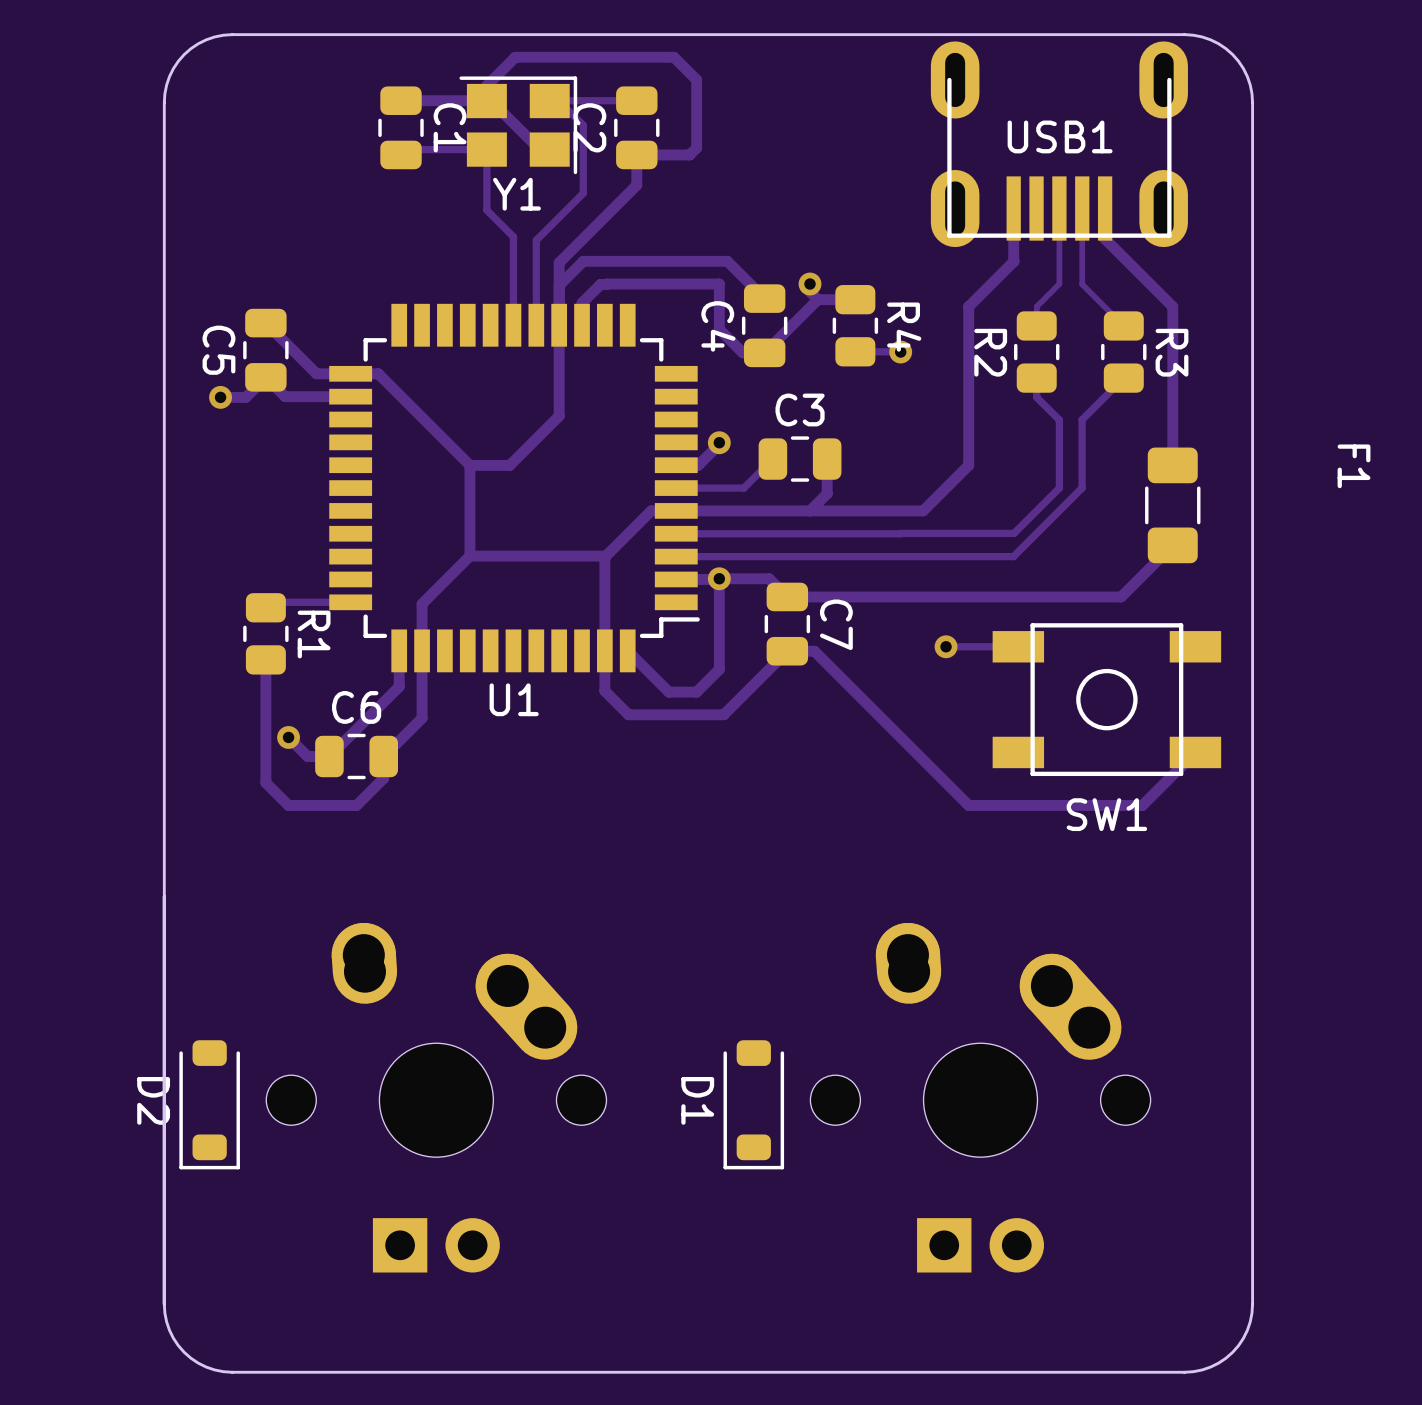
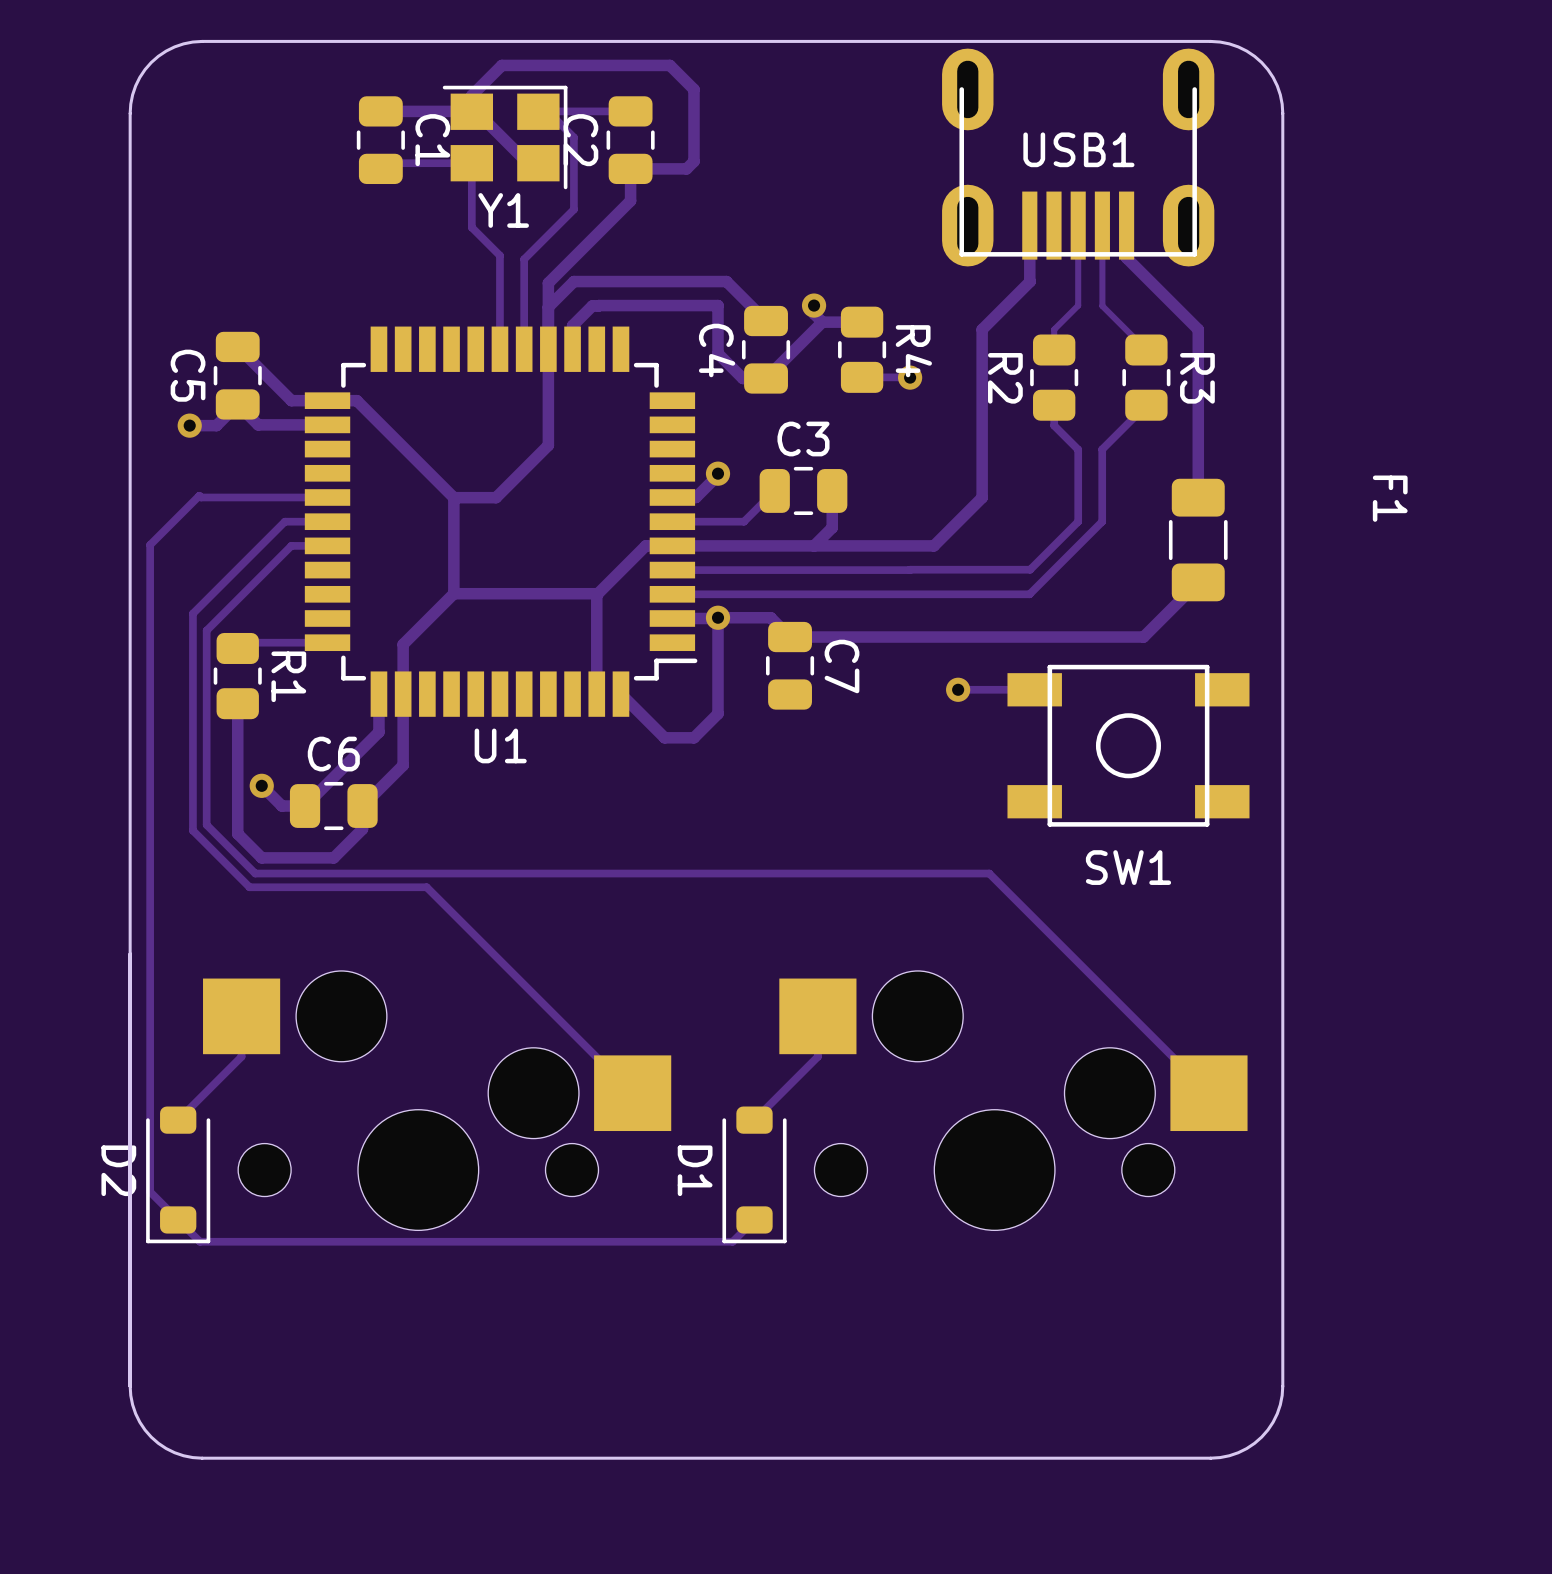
track: none -> (327, 497) (201, 497) (199, 495) (150, 544) (150, 1191) (200, 1241) (732, 1241) (754, 1219)
track: none -> (327, 521) (284, 521) (192, 613) (192, 830) (249, 887) (426, 887) (632, 1093)
track: none -> (327, 545) (291, 545) (206, 630) (206, 824) (255, 873) (989, 873) (1208, 1093)
track: (604, 650) (604, 691) (628, 714) (723, 714) (787, 651) (814, 651) (968, 805) (1142, 805) (1195, 752) -> none
track: none -> (241, 1016) (241, 1056) (178, 1120)
track: none -> (817, 1016) (817, 1056) (754, 1120)
part: none -> (437, 1100)
part: none -> (1013, 1100)
part: (436, 1097) -> none
part: (980, 1097) -> none

